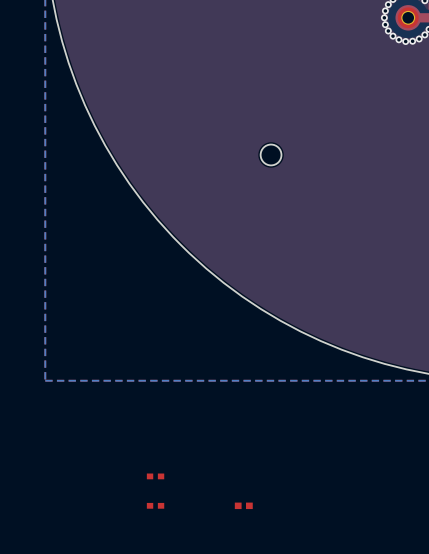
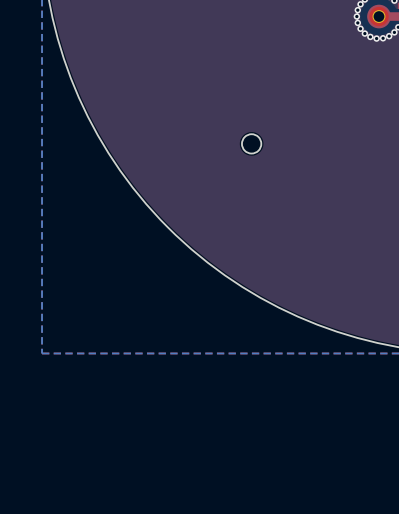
part: (155, 476) -> none
part: (155, 505) -> none
part: (243, 505) -> none

